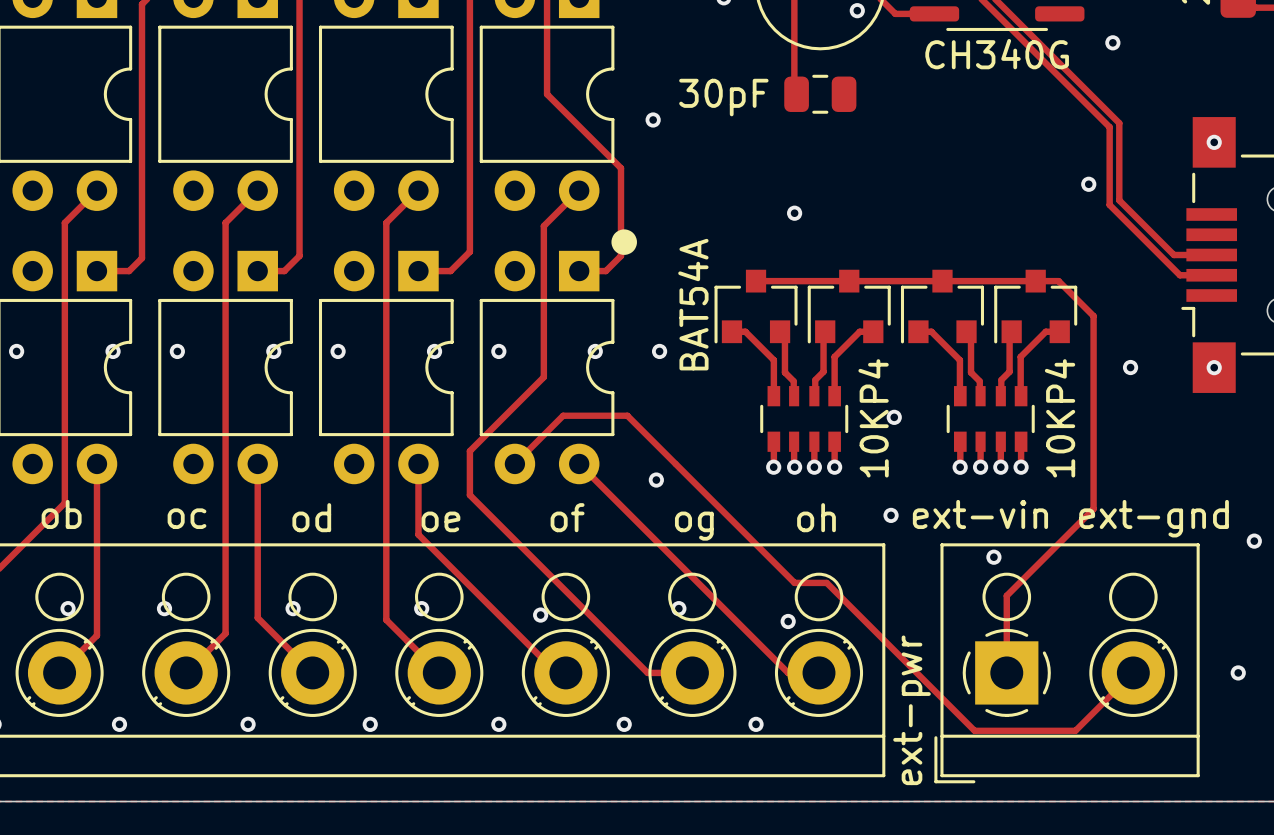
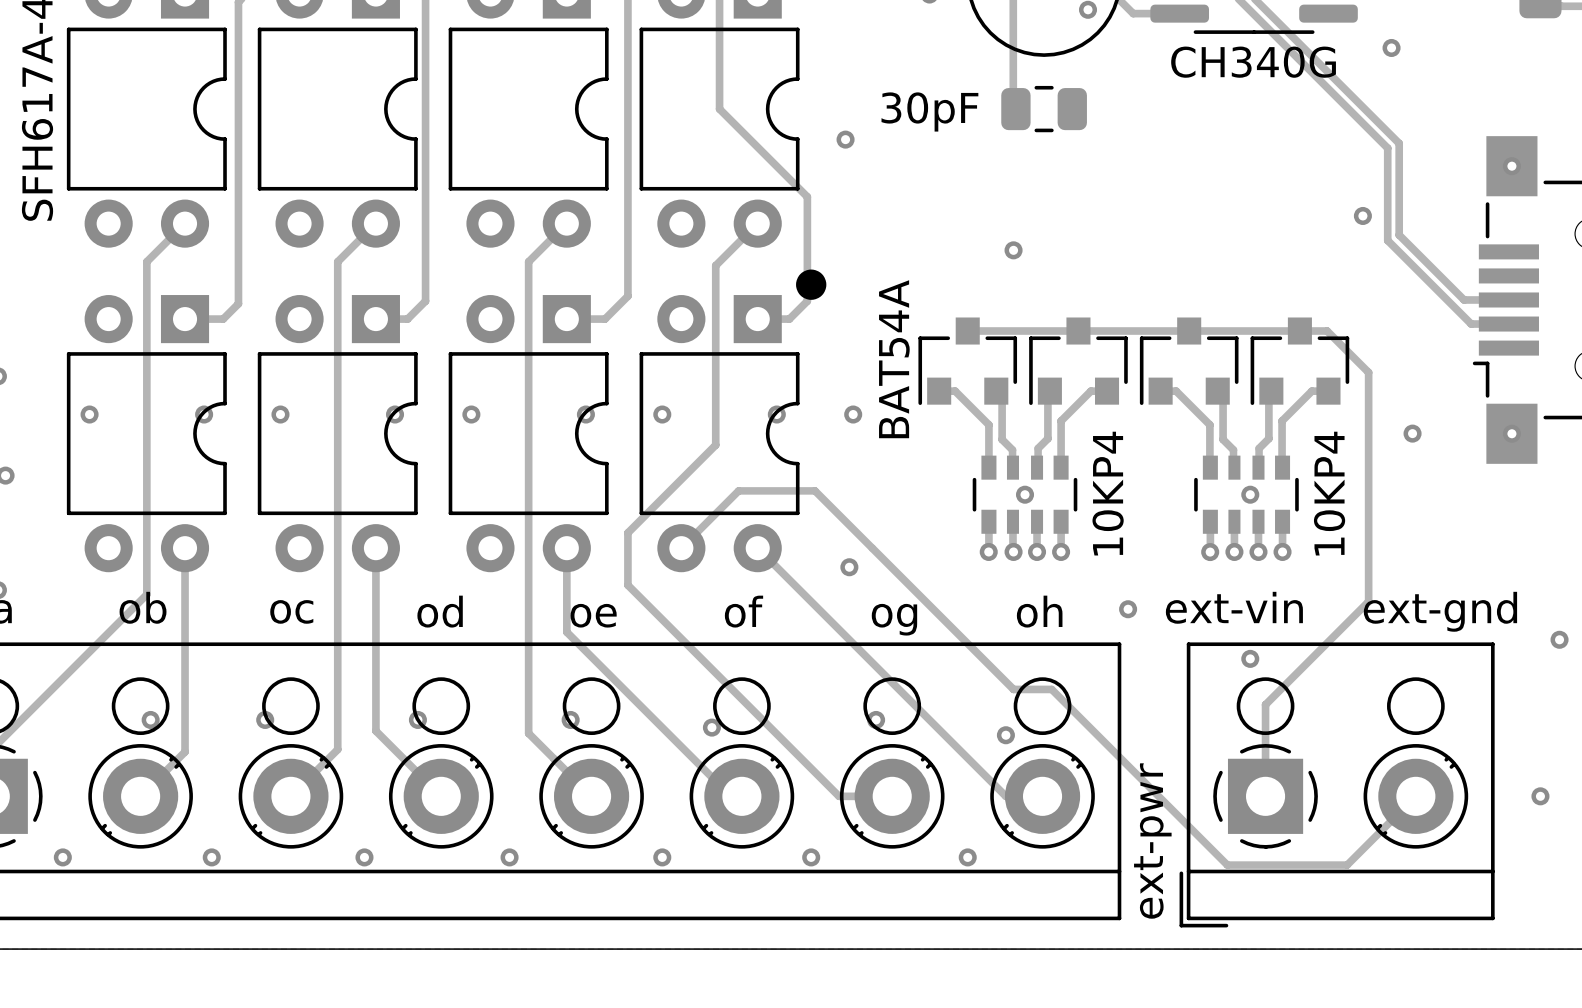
via: (894, 417) -> none
via: none -> (1025, 494)
via: none -> (1250, 494)

